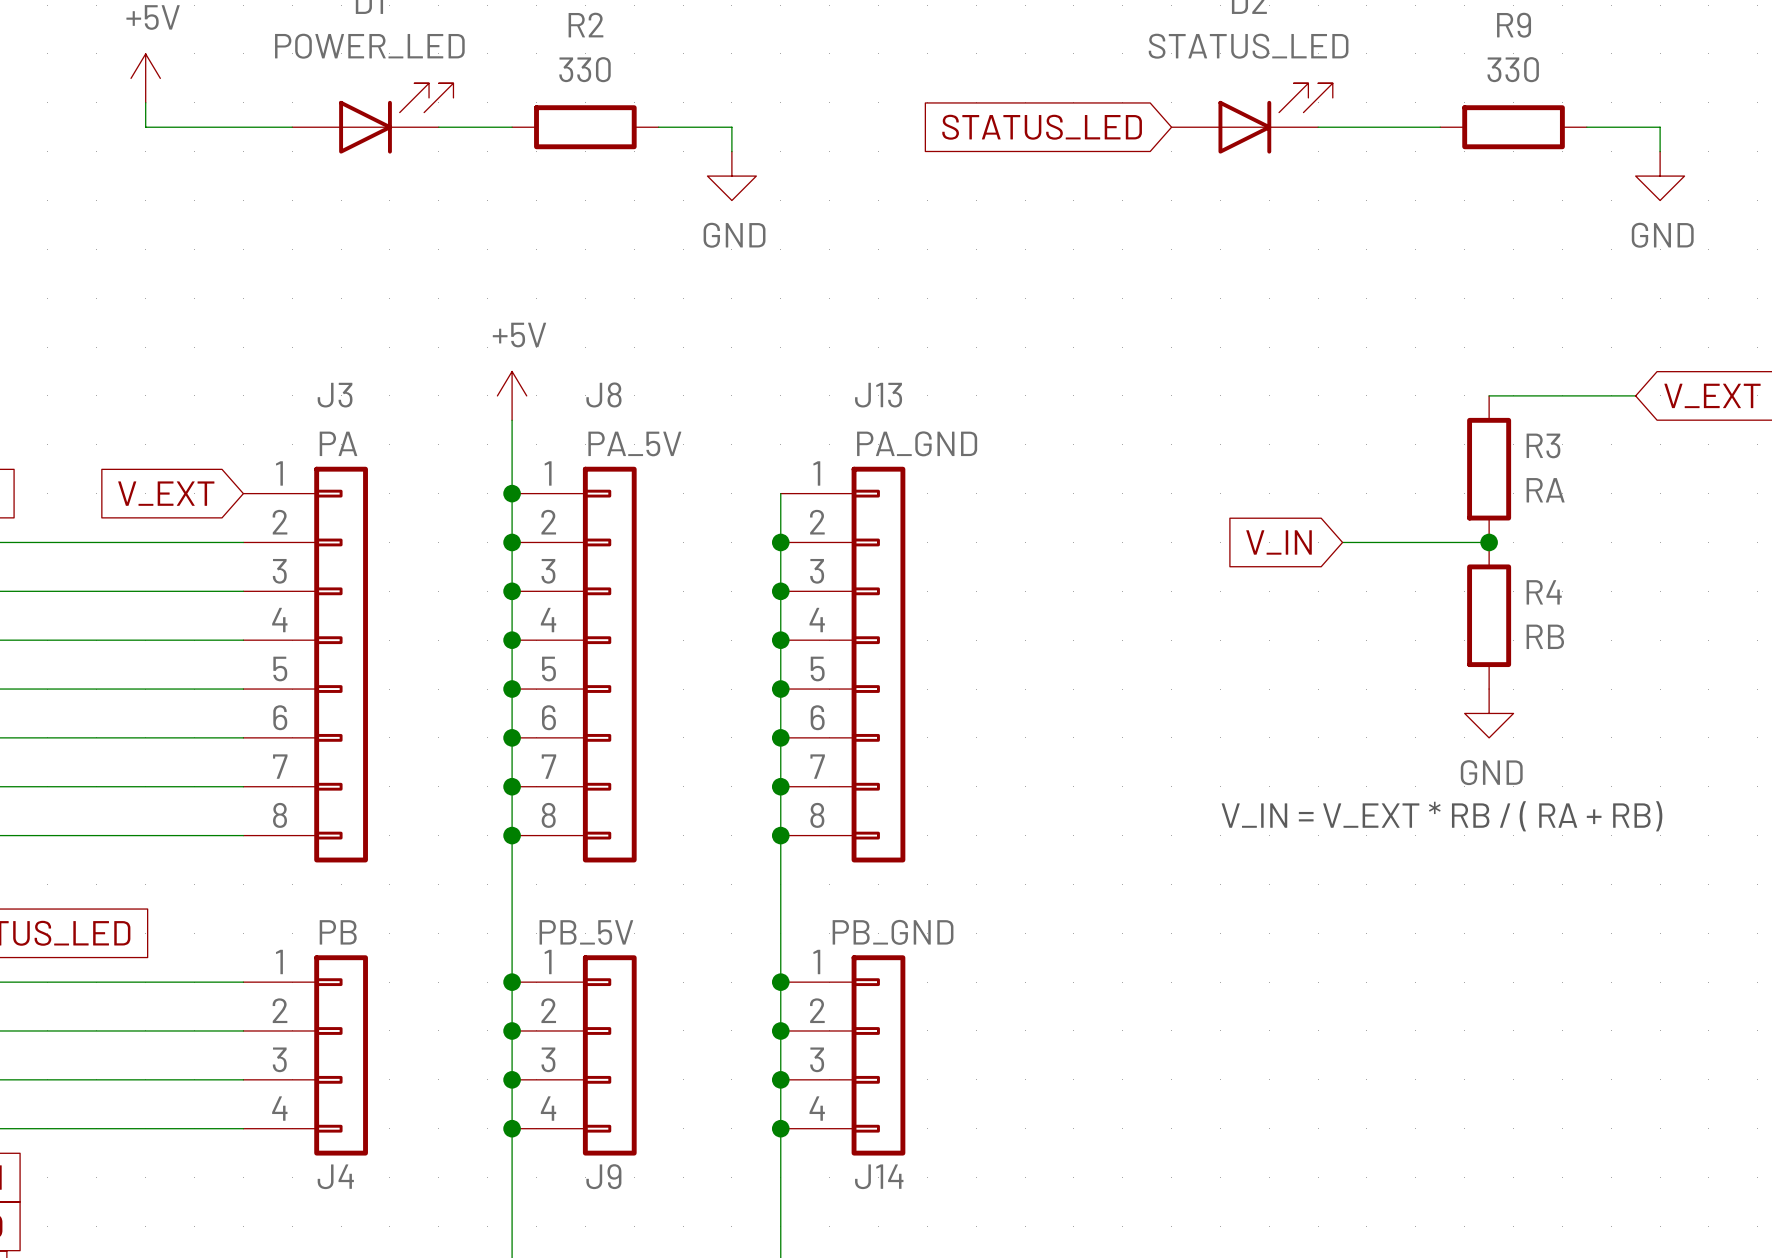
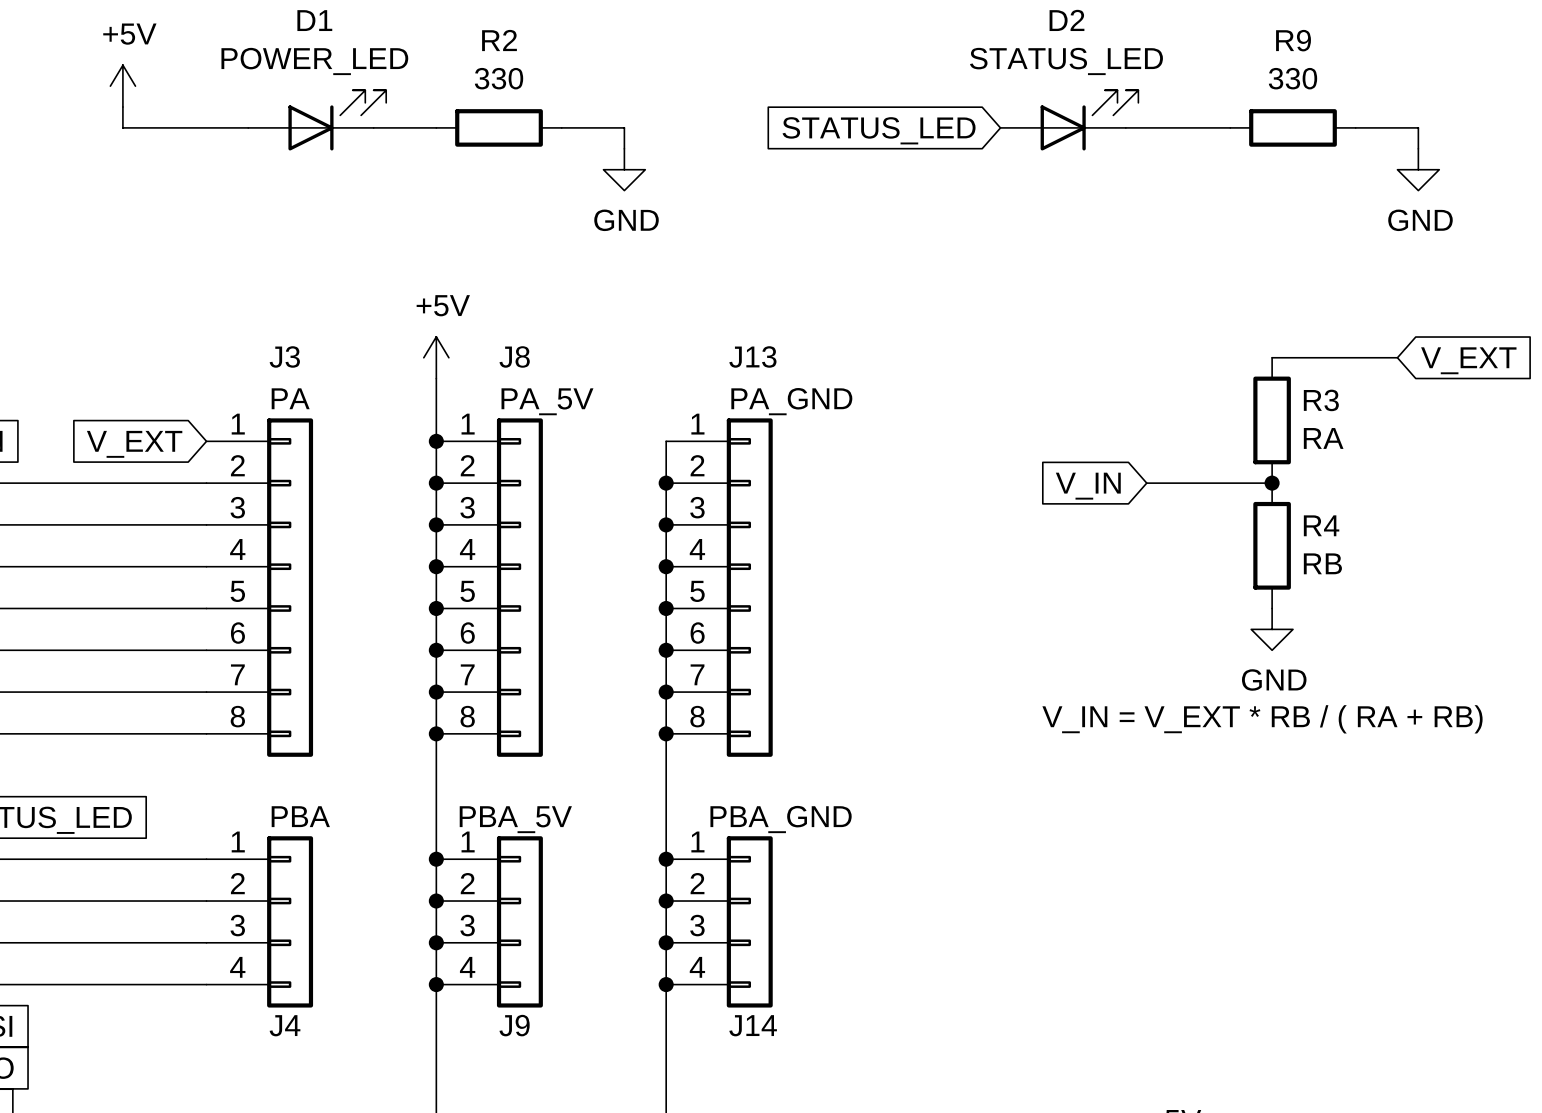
J4 value: PB (338, 932) -> PBA (300, 816)
J9 value: PB_5V (586, 932) -> PBA_5V (515, 819)
J14 value: PB_GND (893, 932) -> PBA_GND (781, 819)

